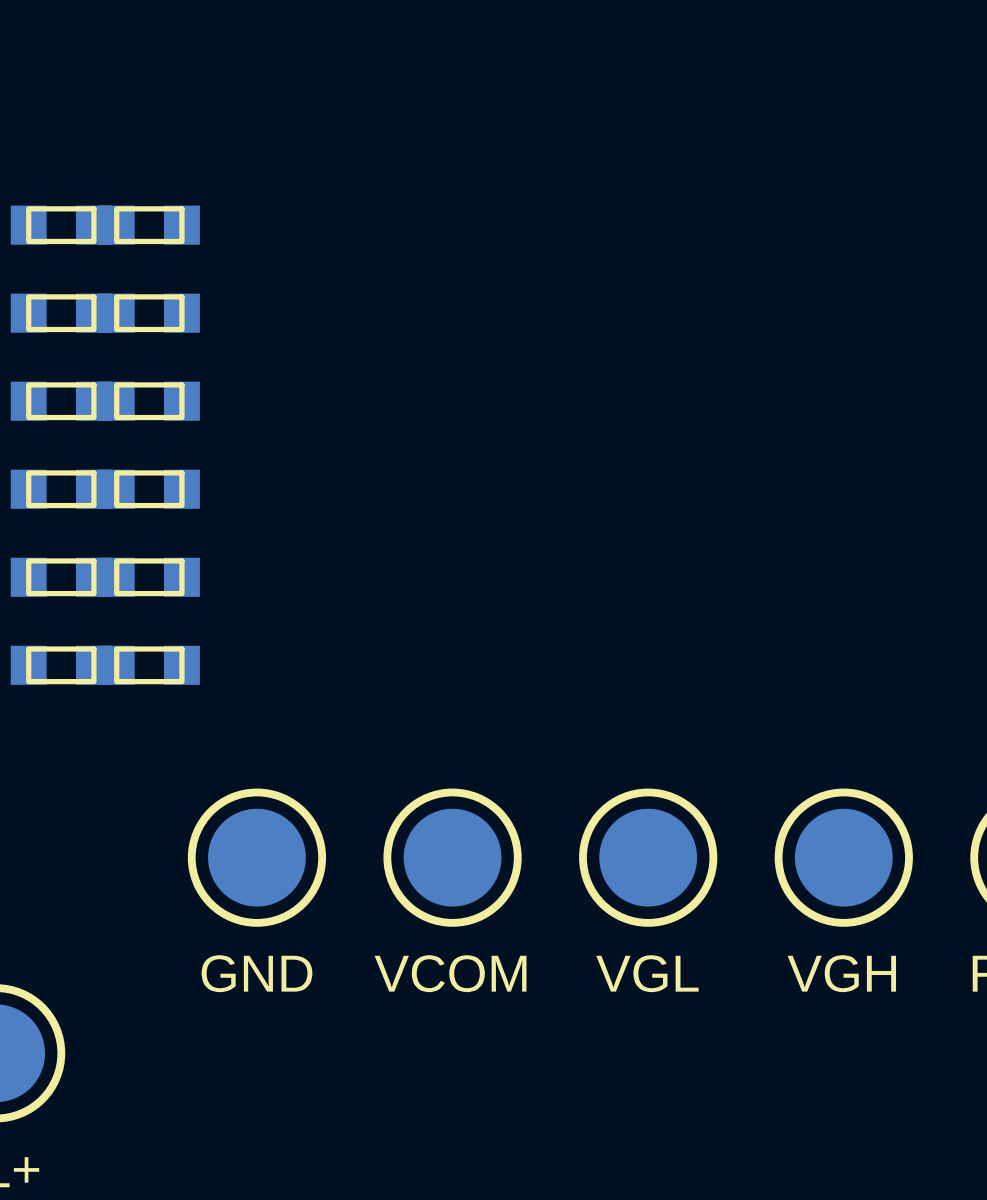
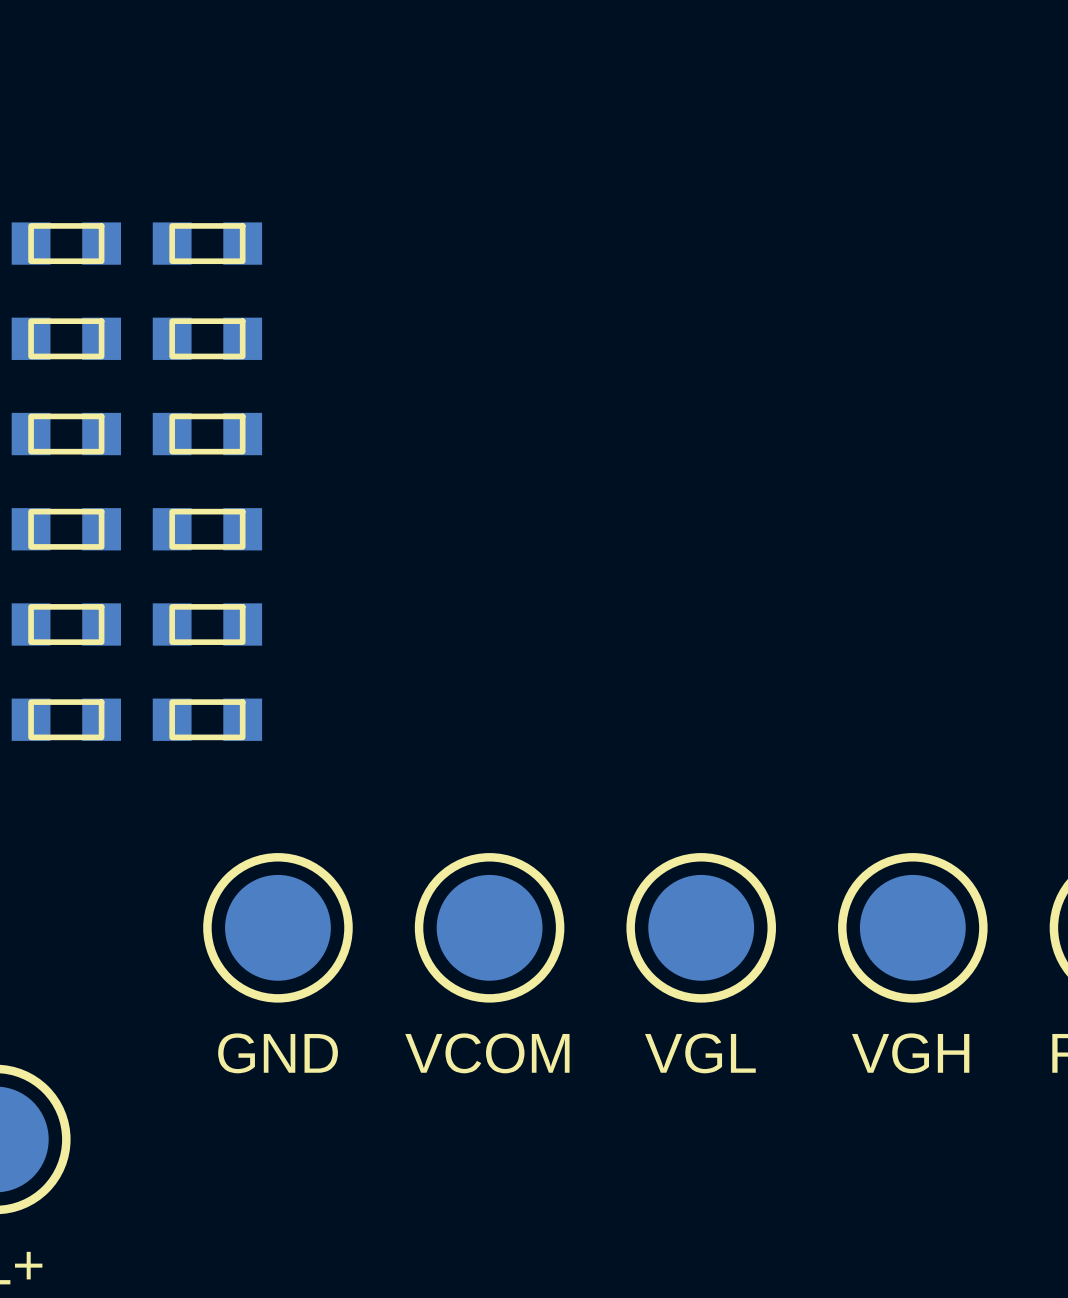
part position: (149, 225) -> (207, 243)
part position: (149, 313) -> (207, 338)
part position: (149, 401) -> (207, 434)
part position: (149, 489) -> (207, 529)
part position: (149, 577) -> (207, 624)
part position: (149, 665) -> (207, 719)

